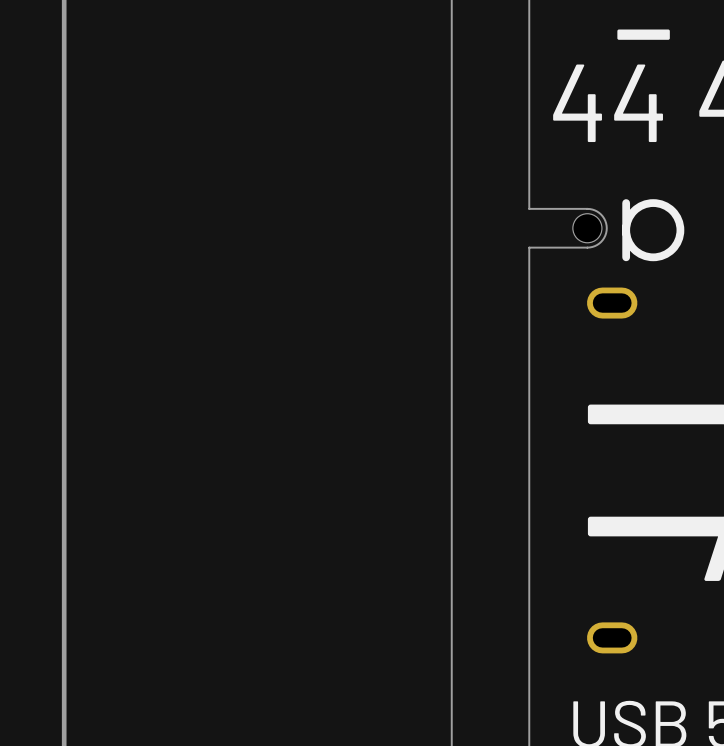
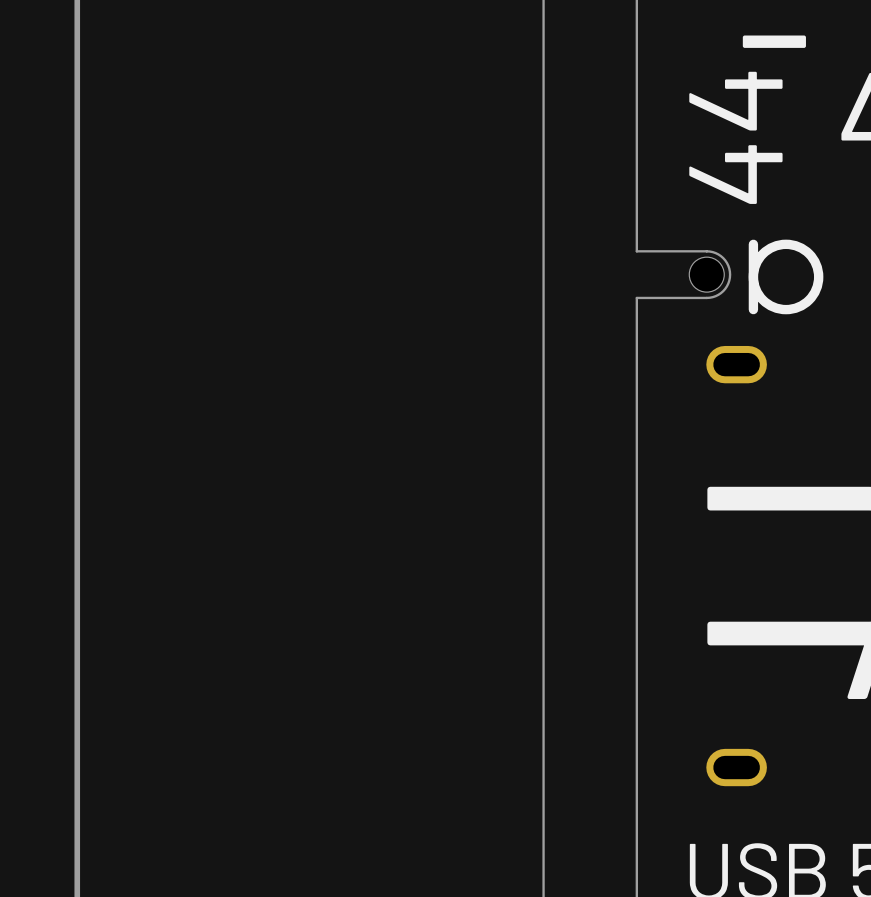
text rotation: 0° (608, 103) -> 90° counterclockwise (735, 137)

